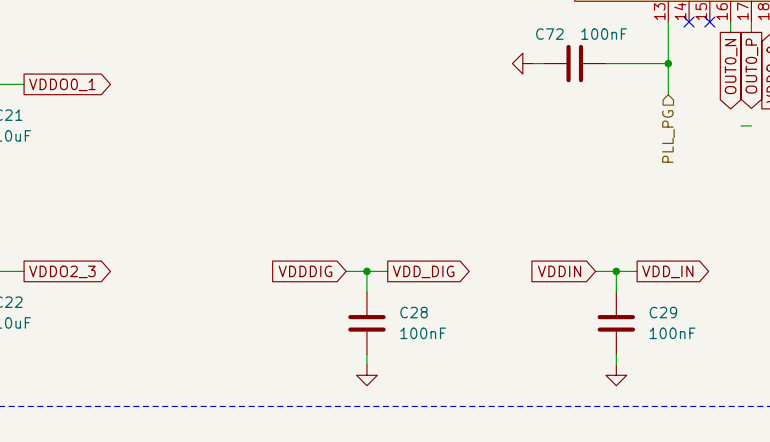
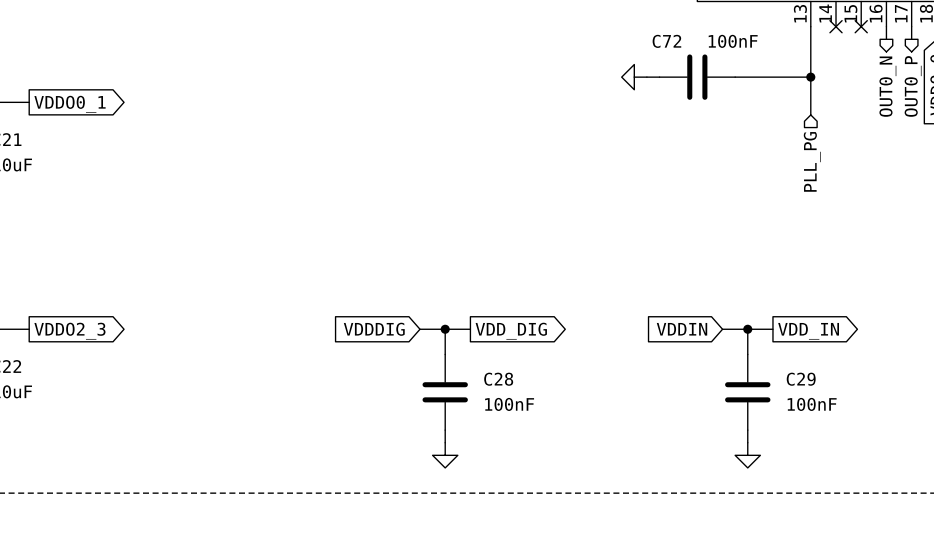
global label: OUT0_N (731, 66) -> none
global label: OUT0_P (751, 66) -> none
hierarchical label: none -> OUT0_N (887, 86)
hierarchical label: none -> OUT0_P (913, 86)
wire: (741, 125) (751, 125) -> none

